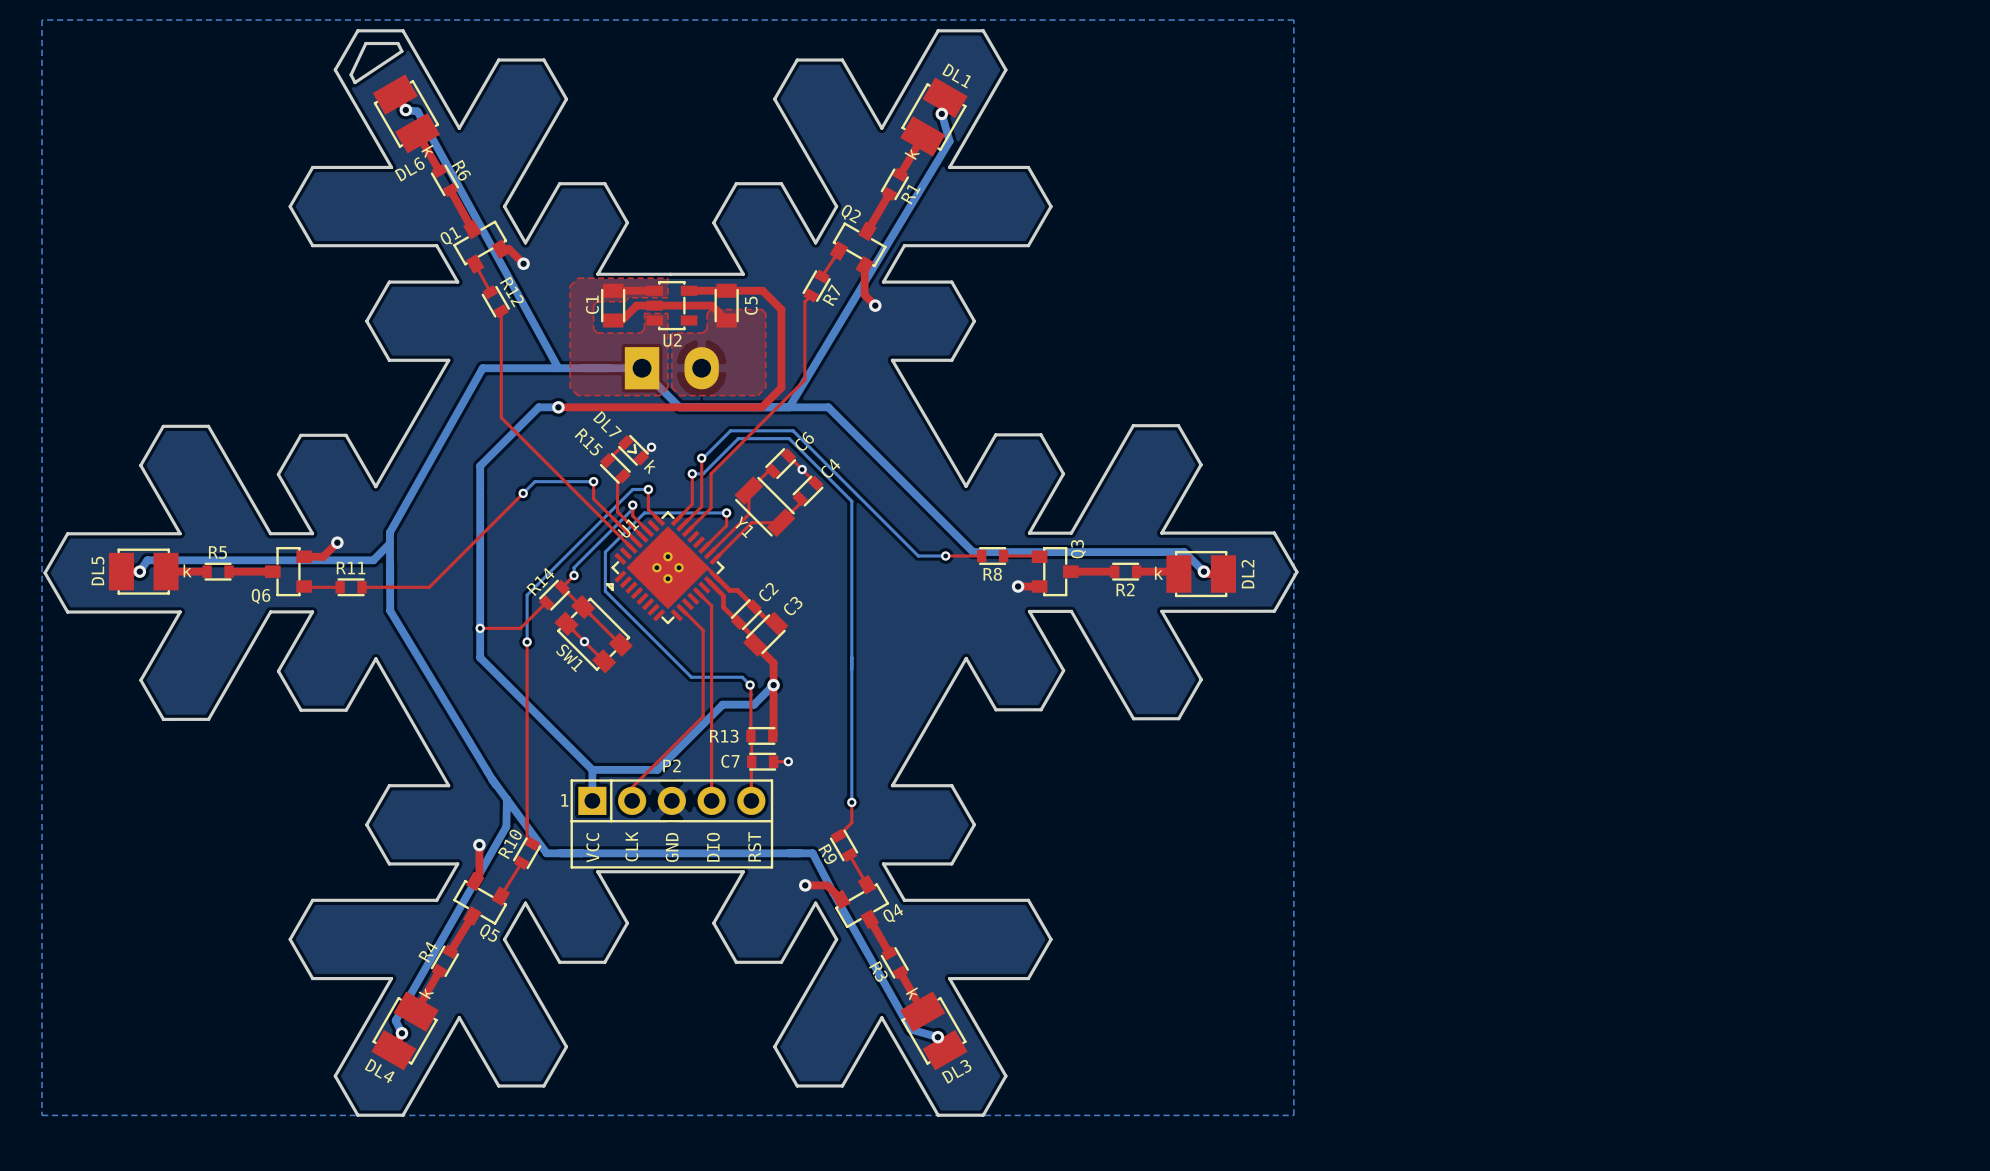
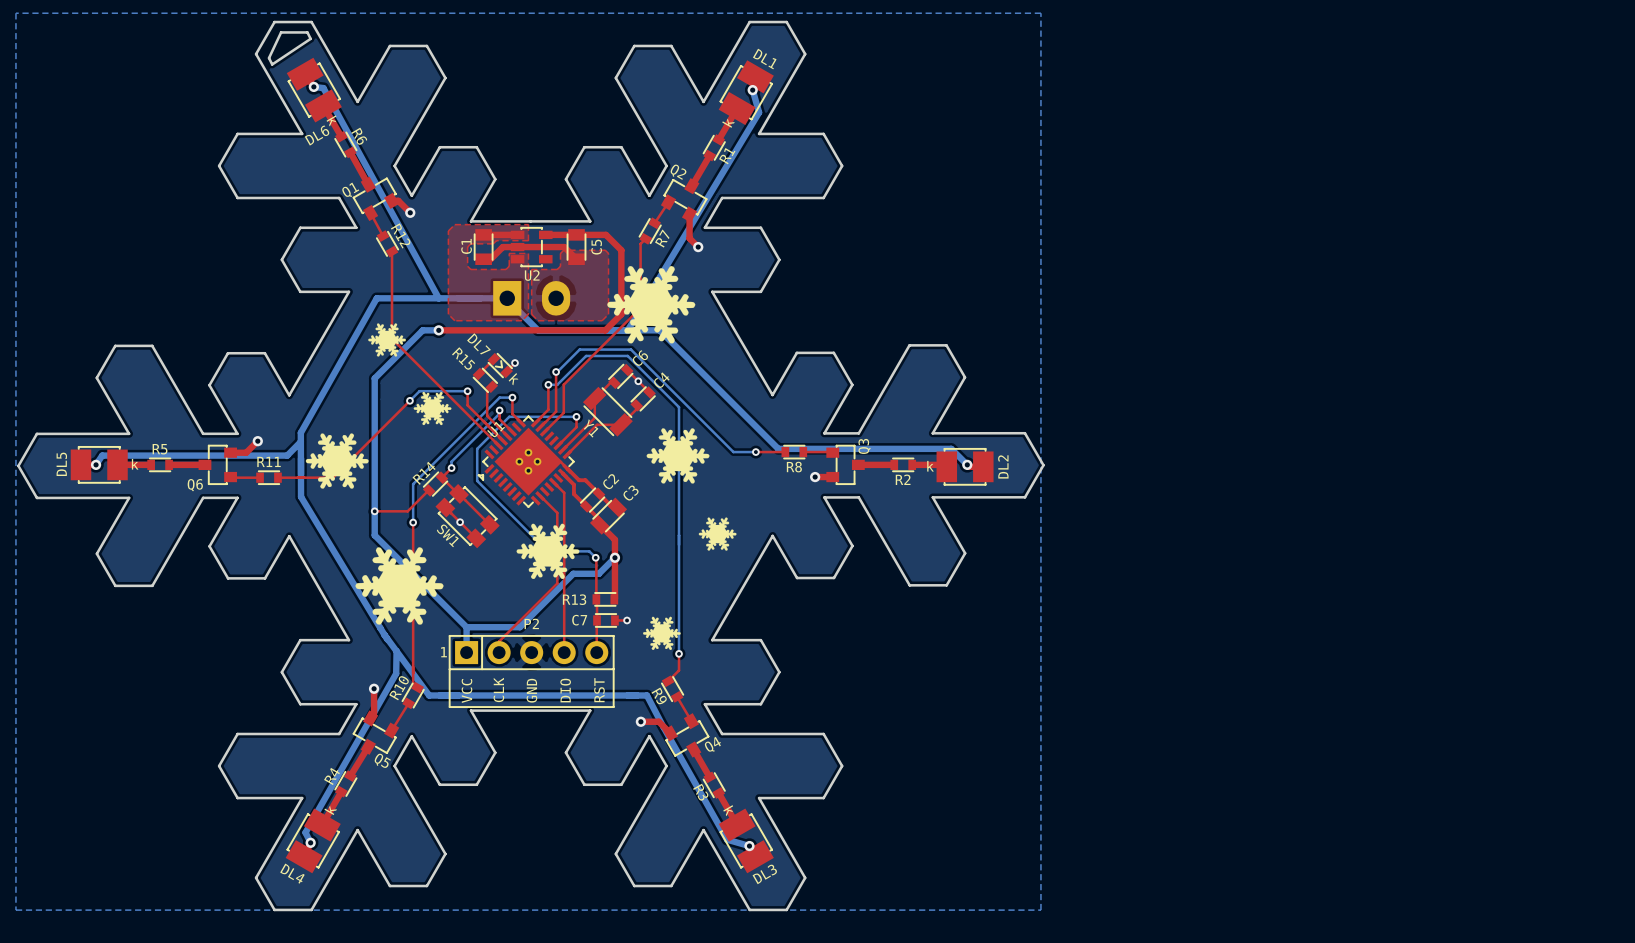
drawing: none -> [607, 266, 696, 344]
drawing: none -> [368, 323, 406, 357]
drawing: none -> [413, 391, 452, 426]
drawing: none -> [646, 428, 710, 484]
drawing: none -> [305, 433, 369, 489]
drawing: none -> [698, 517, 737, 551]
drawing: none -> [516, 523, 580, 579]
drawing: none -> [355, 547, 444, 625]
drawing: none -> [643, 616, 681, 650]

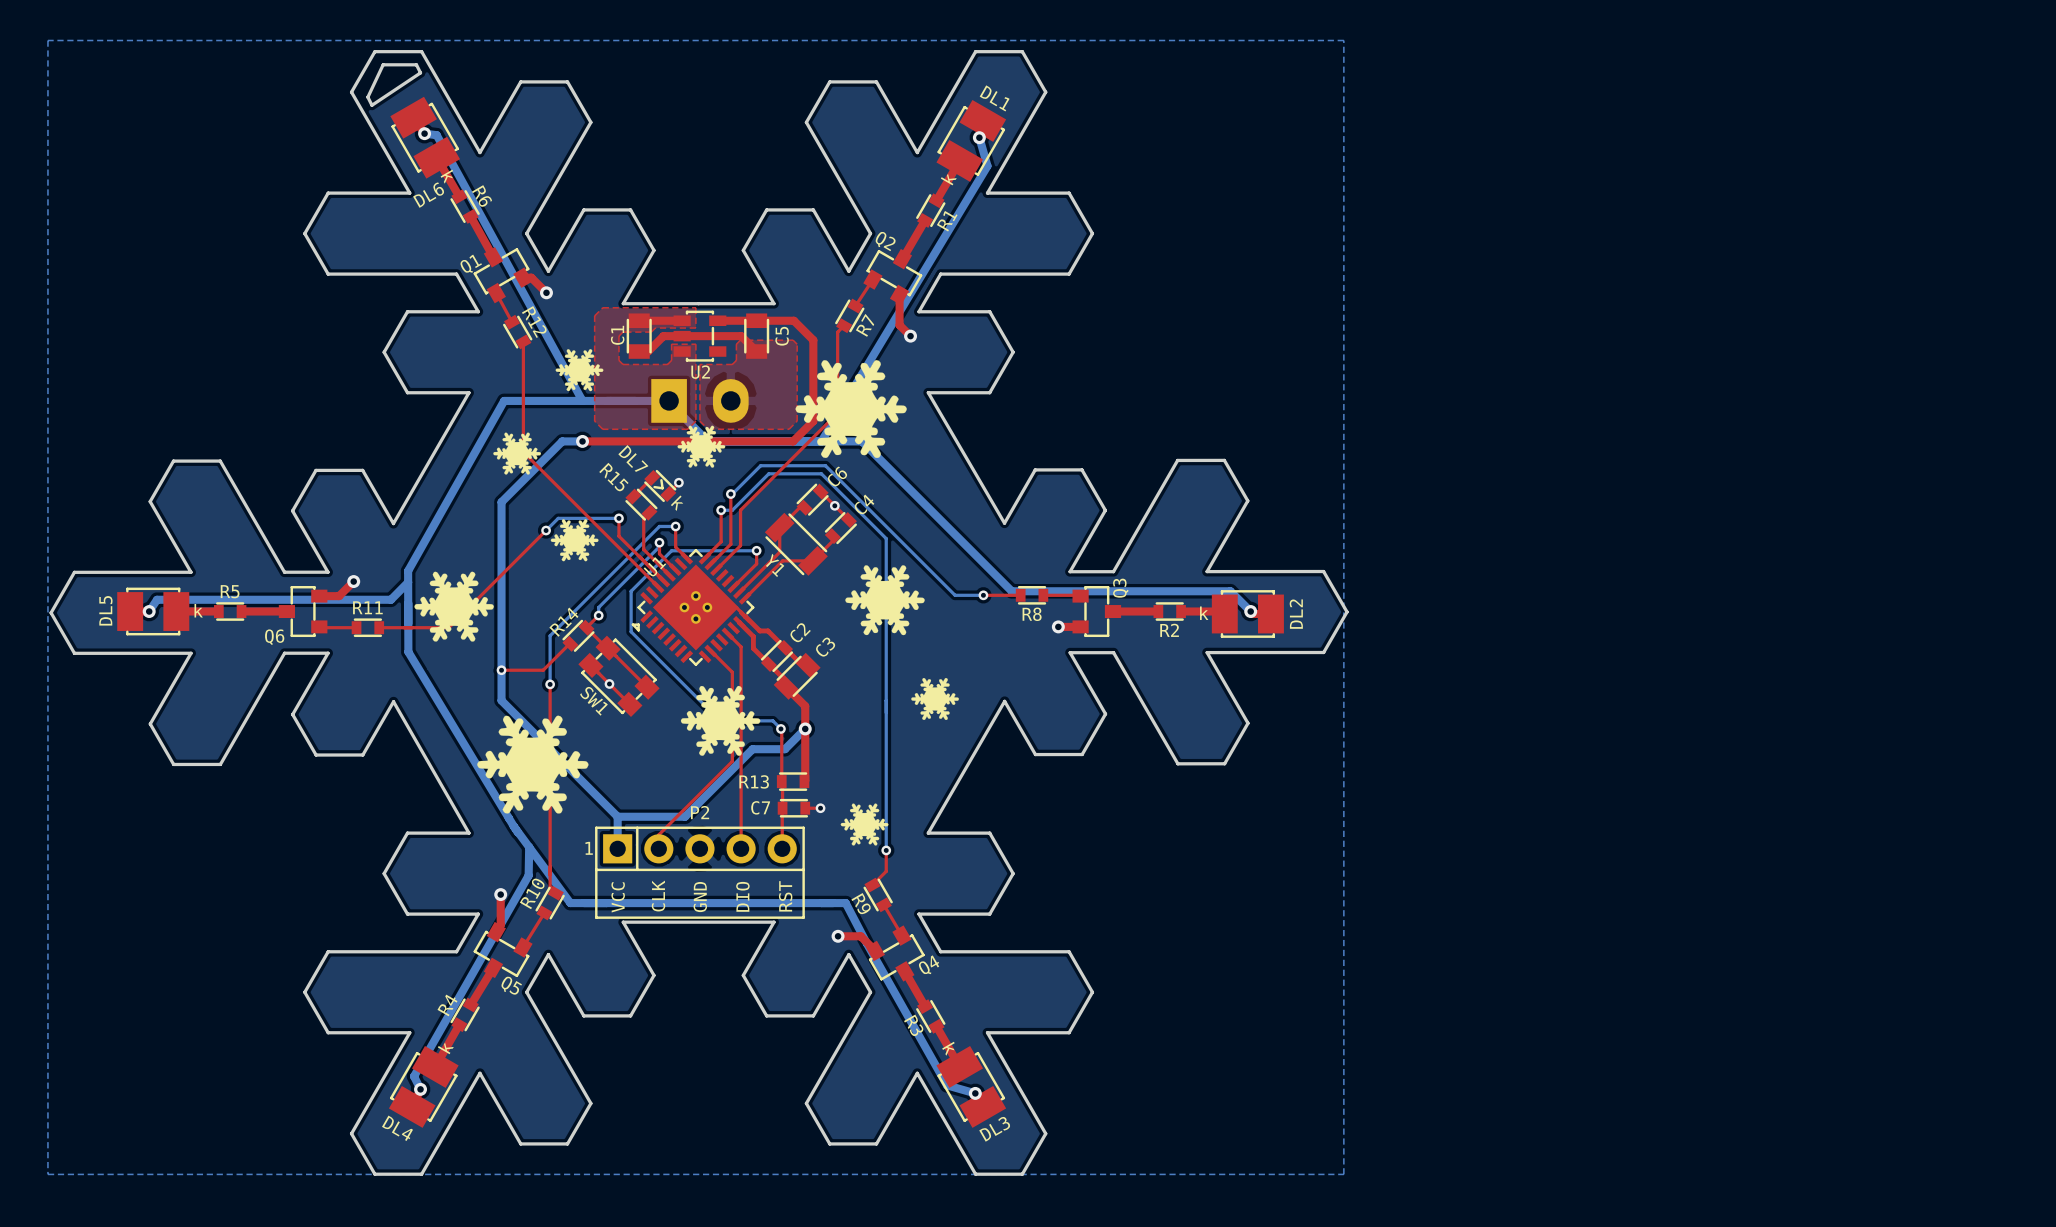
drawing: none -> [555, 349, 604, 392]
drawing: none -> [677, 425, 726, 468]

